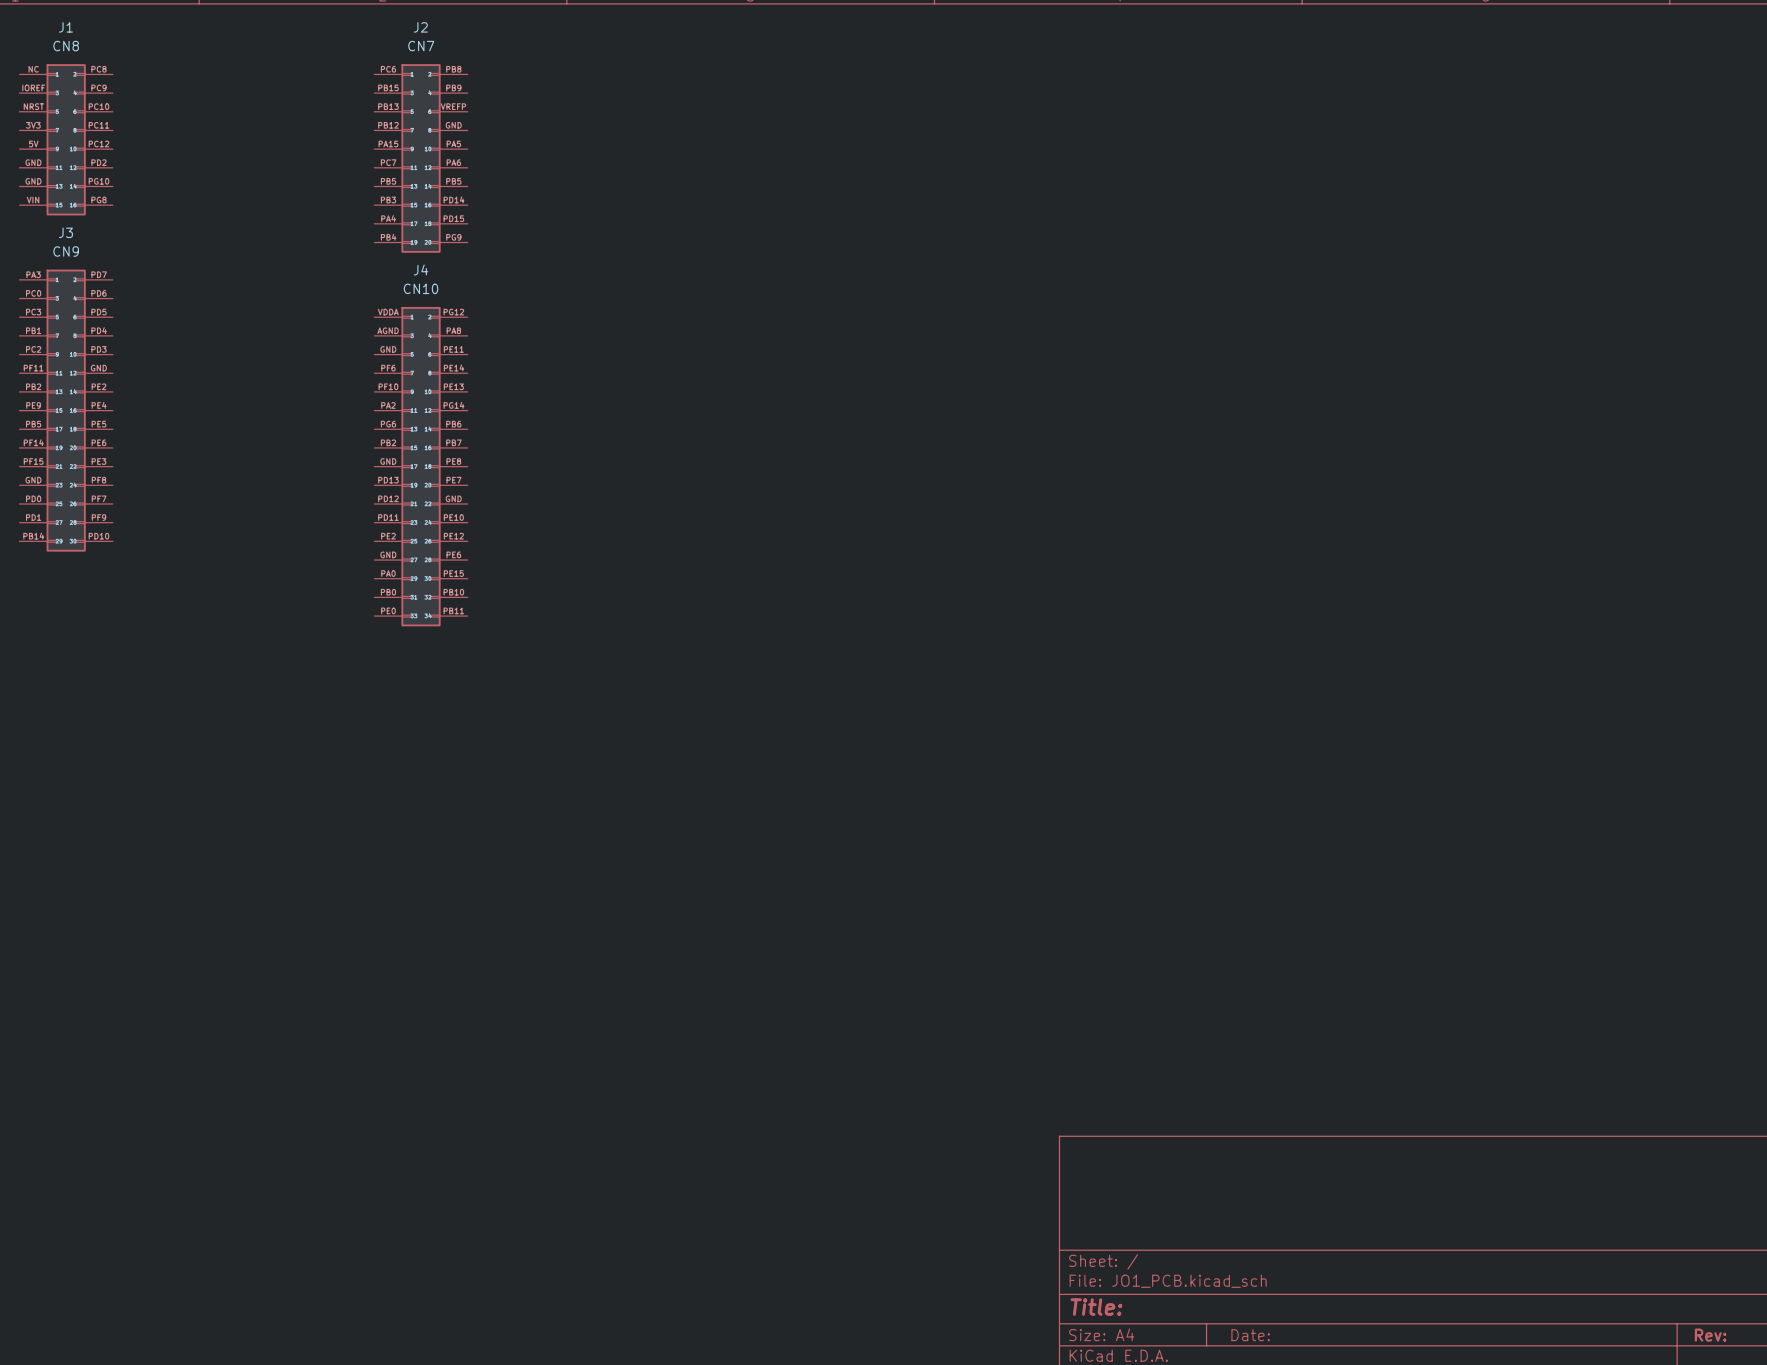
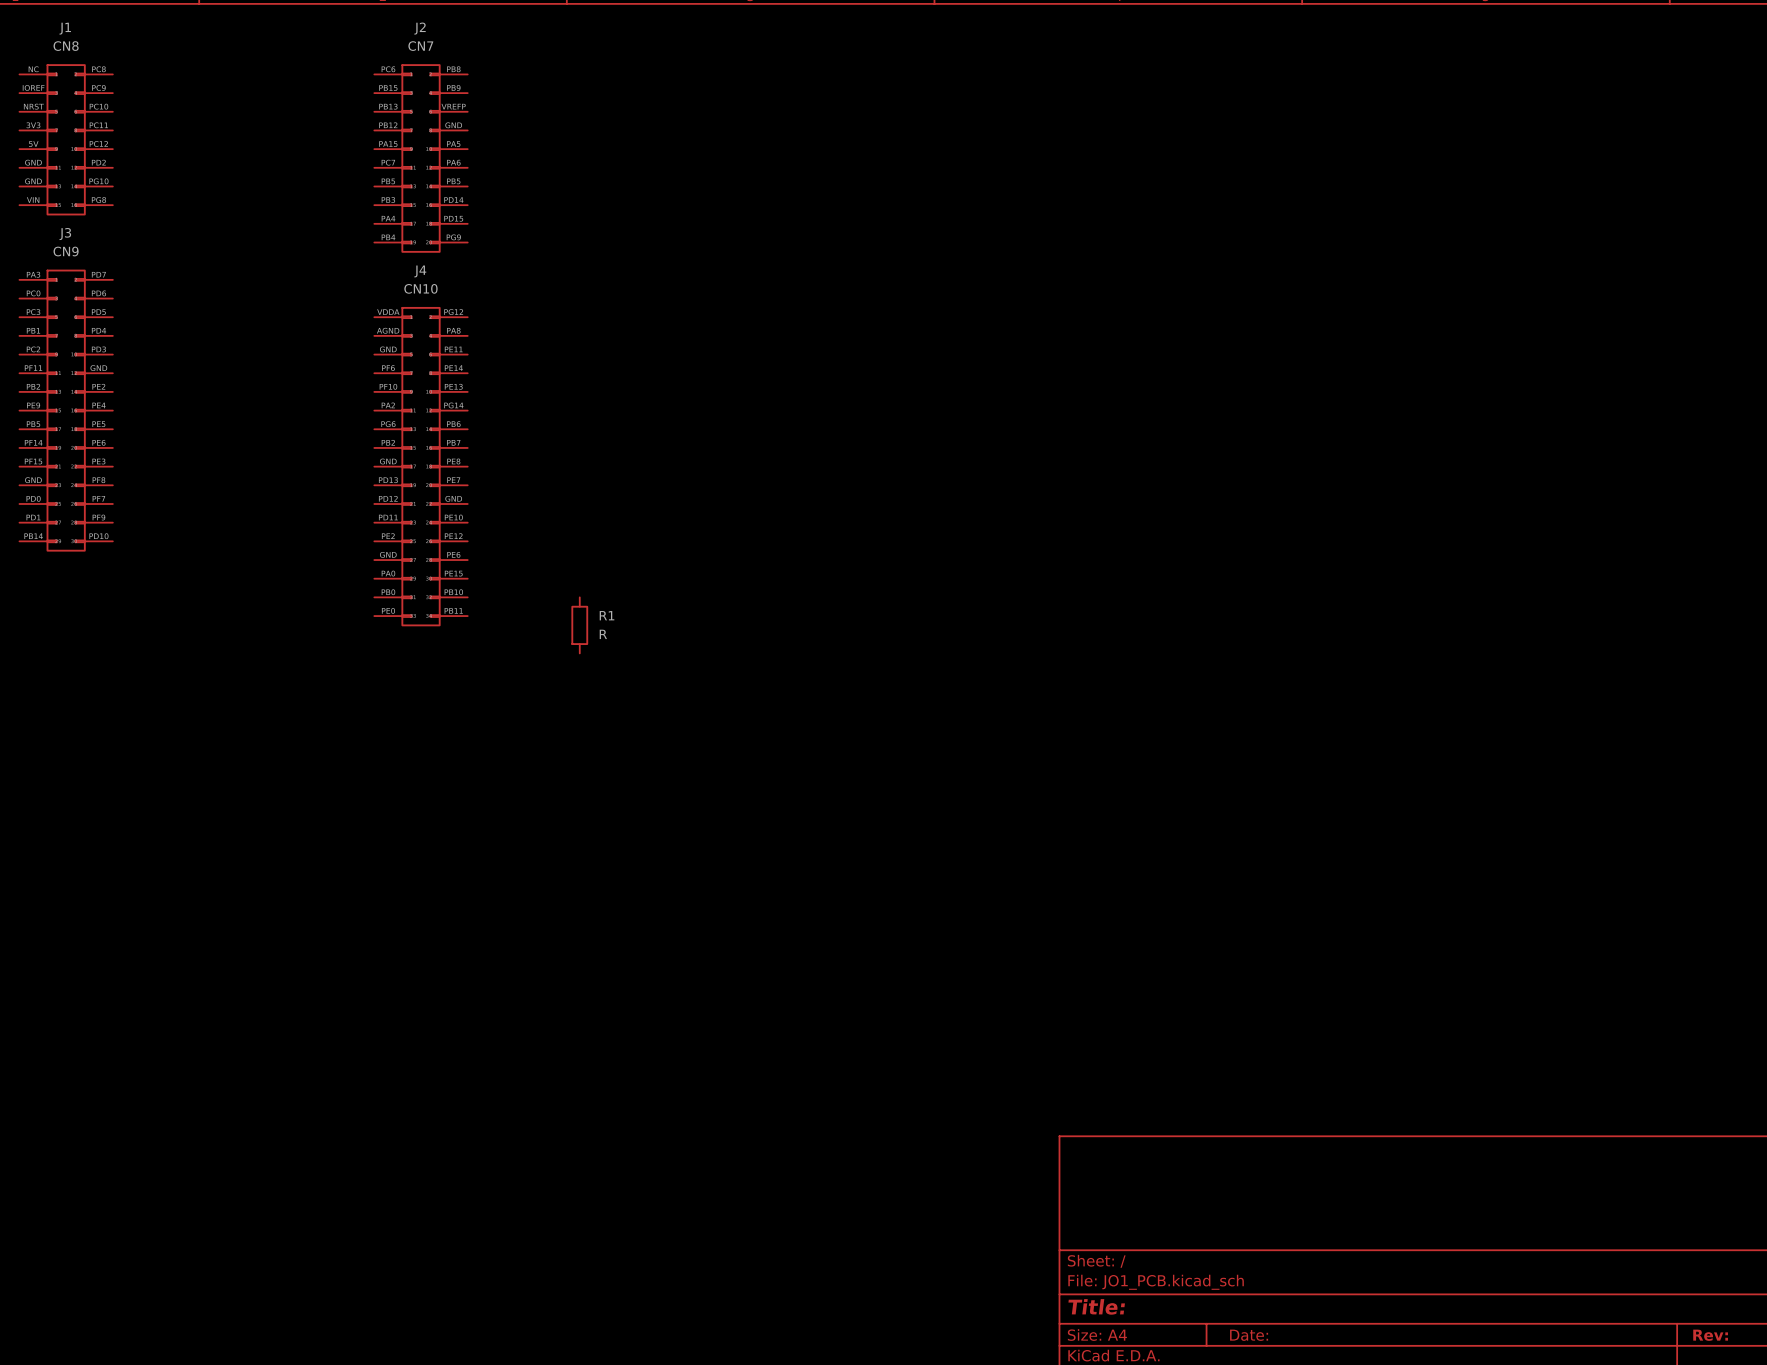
R1: none -> R (579, 625)

